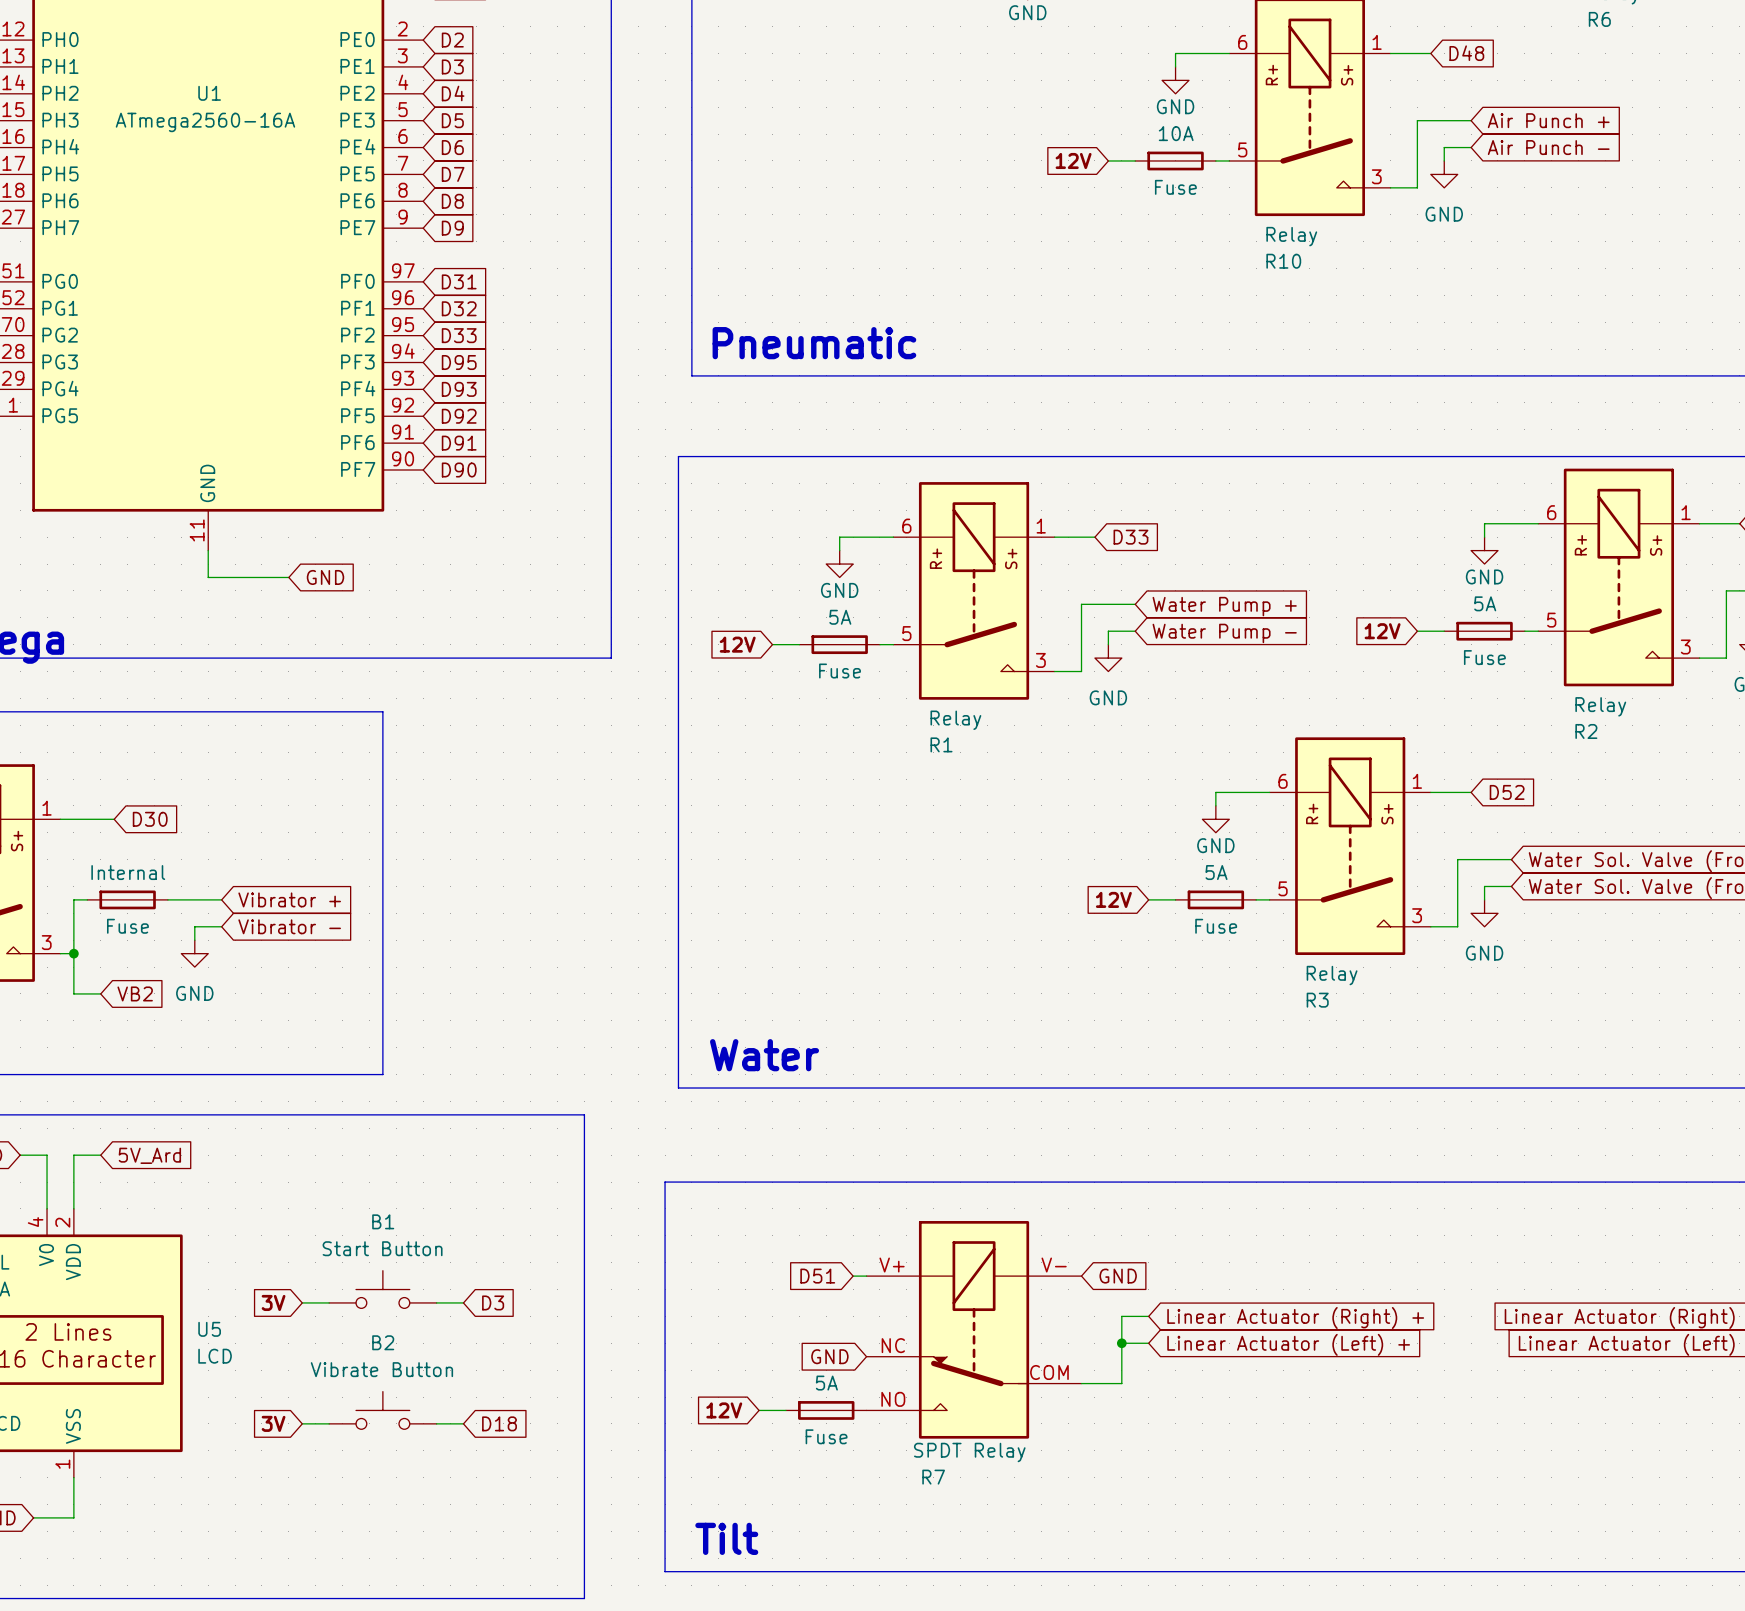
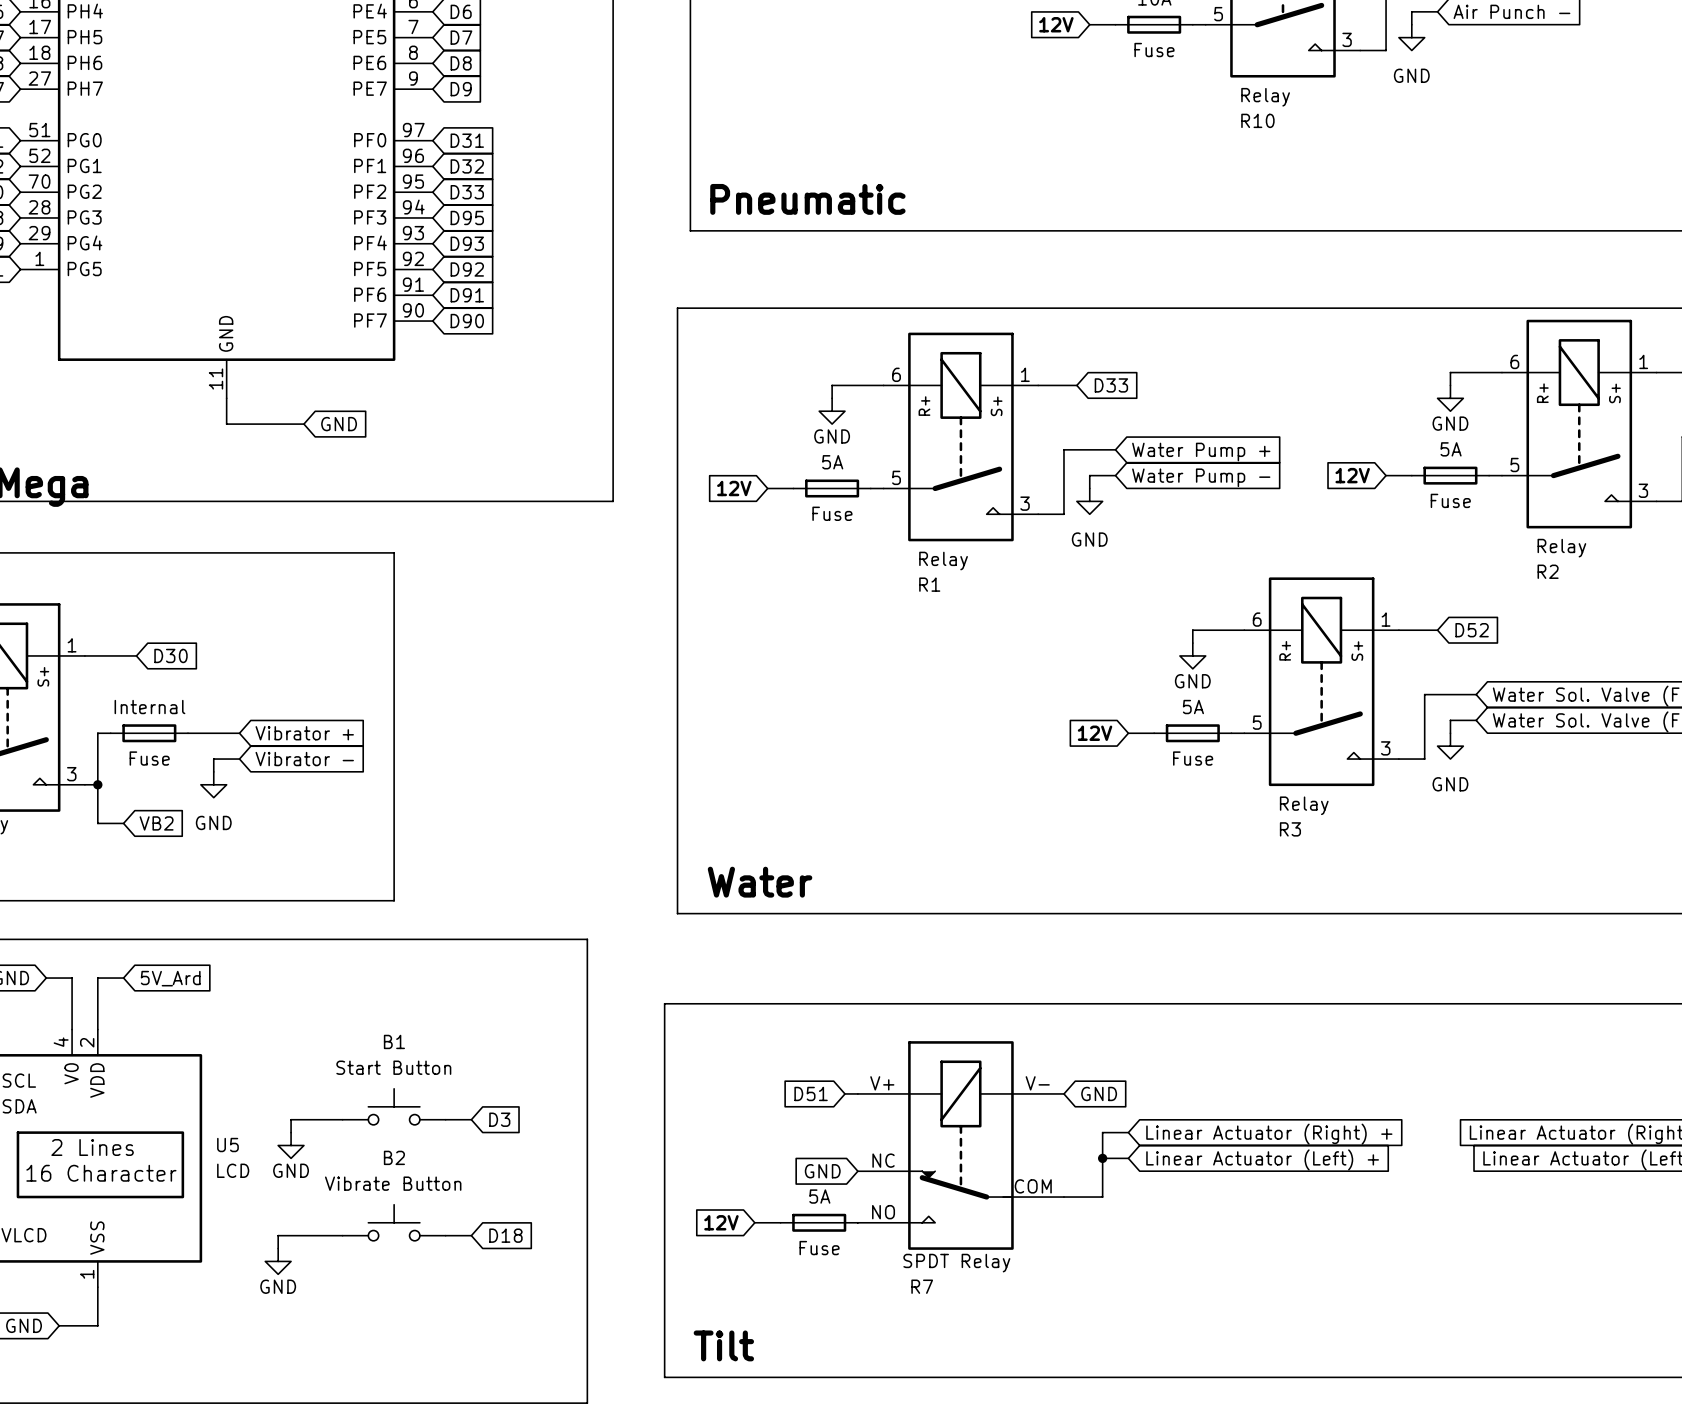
global label: 3V (273, 1302) -> none
wire: none -> (316, 1119) (291, 1119) (291, 1132)
power symbol: none -> GND (291, 1145)
global label: 3V (273, 1423) -> none
wire: none -> (316, 1235) (278, 1235) (278, 1248)
power symbol: none -> GND (278, 1261)

